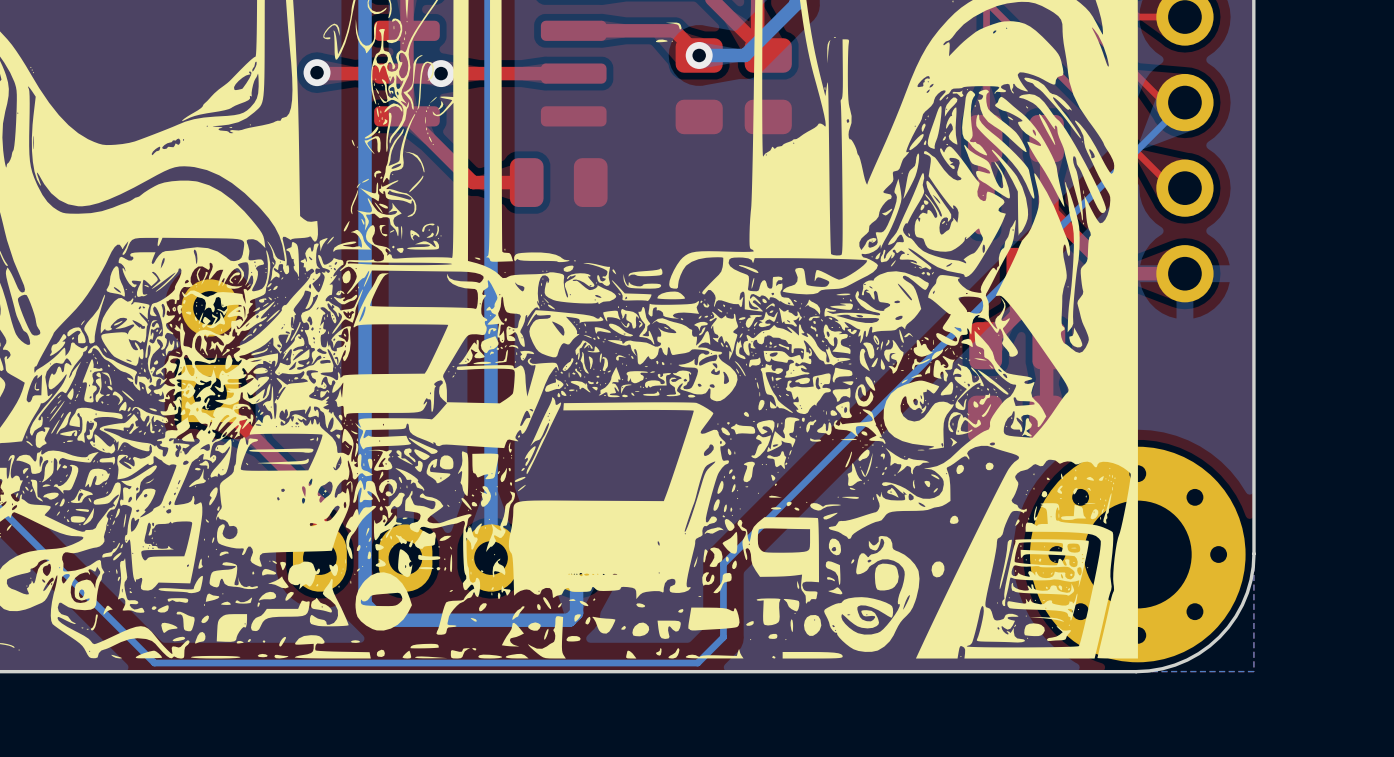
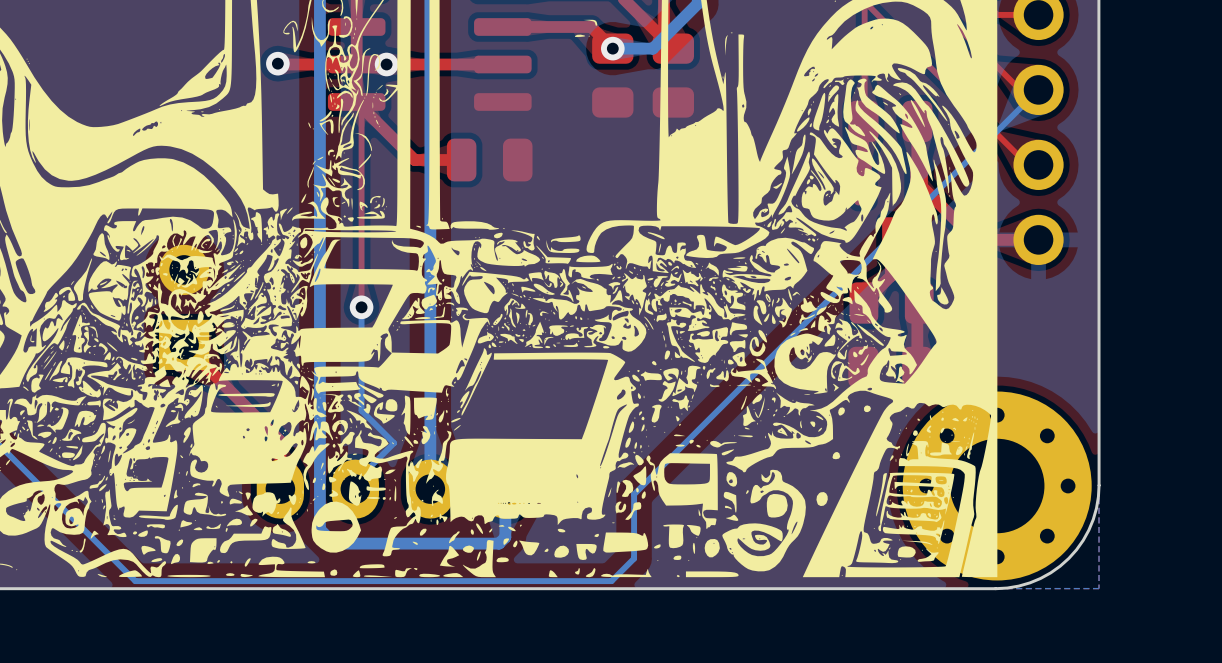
top track: none -> (356, 101) (361, 106) (361, 307)
bottom track: none -> (361, 307) (361, 410) (394, 443) (355, 481) (355, 489)
via: none -> (361, 307)

